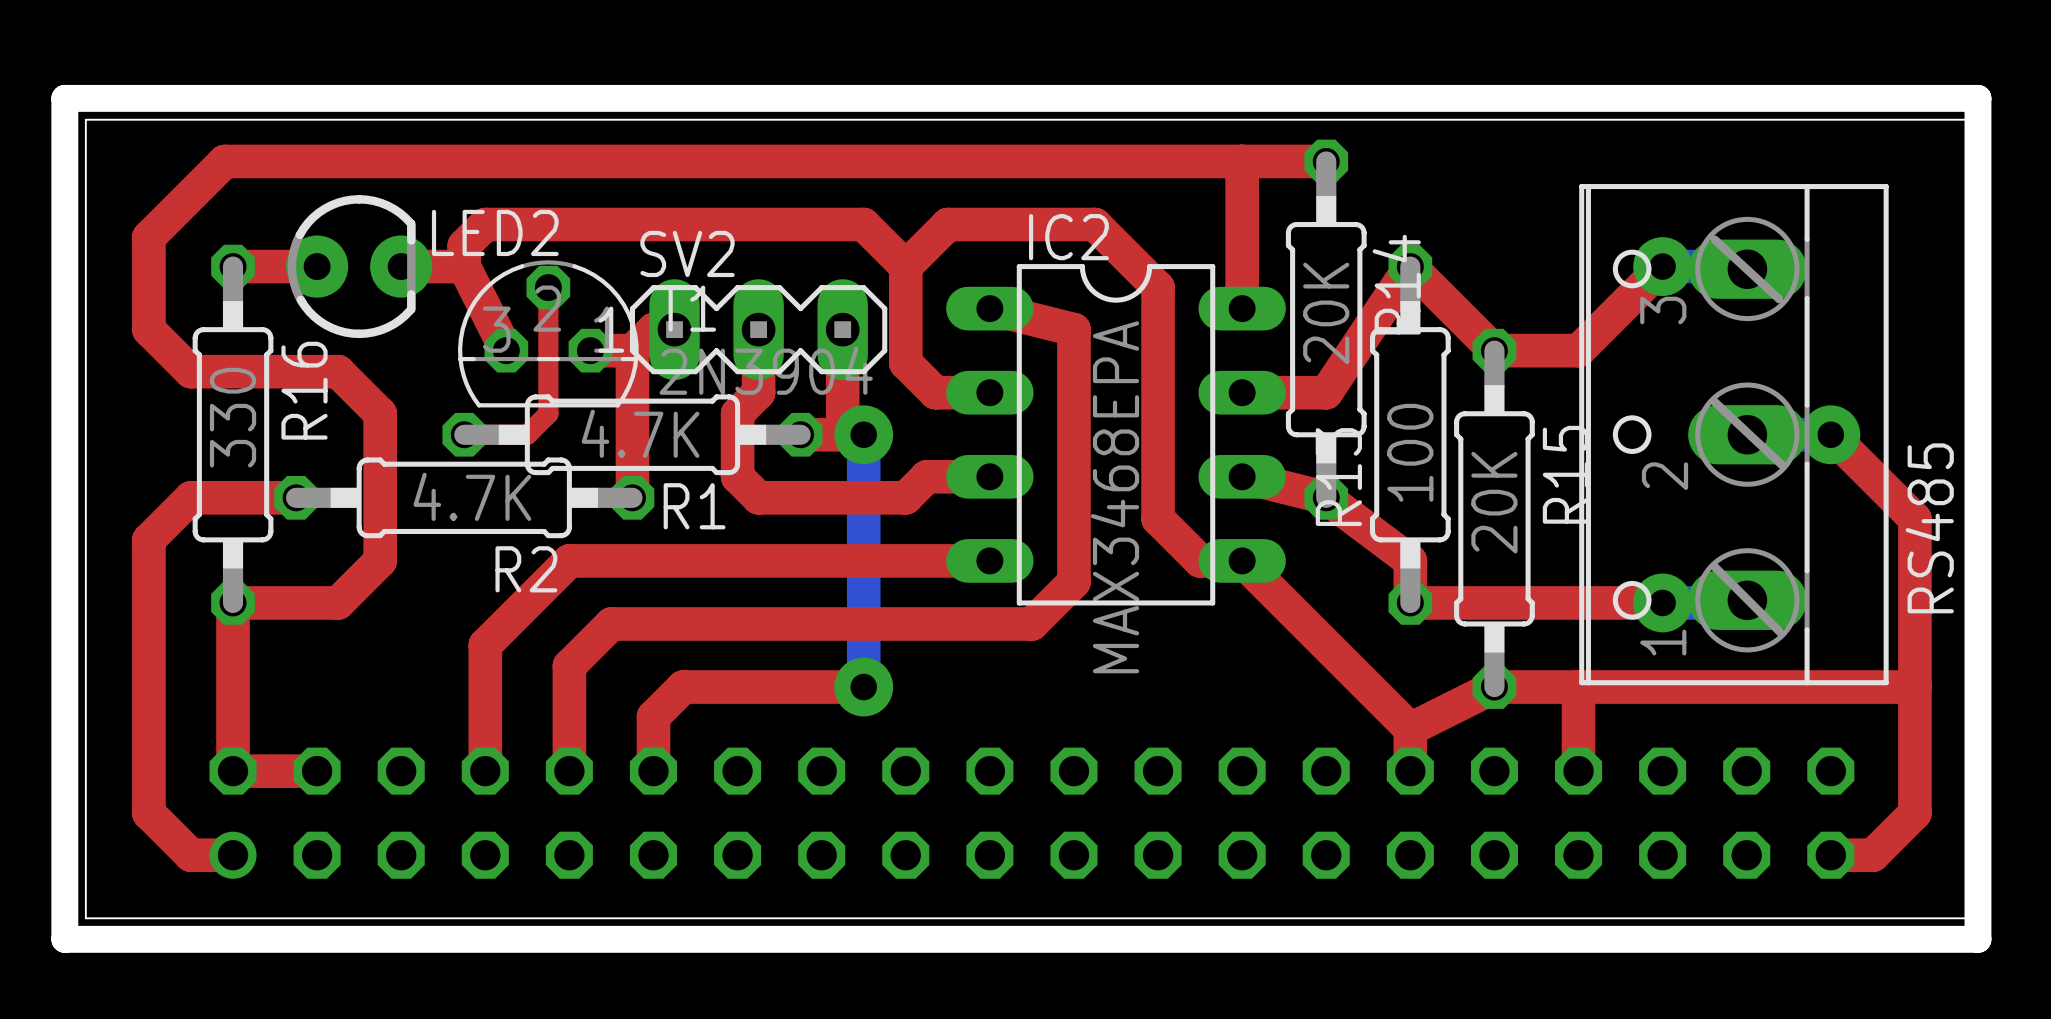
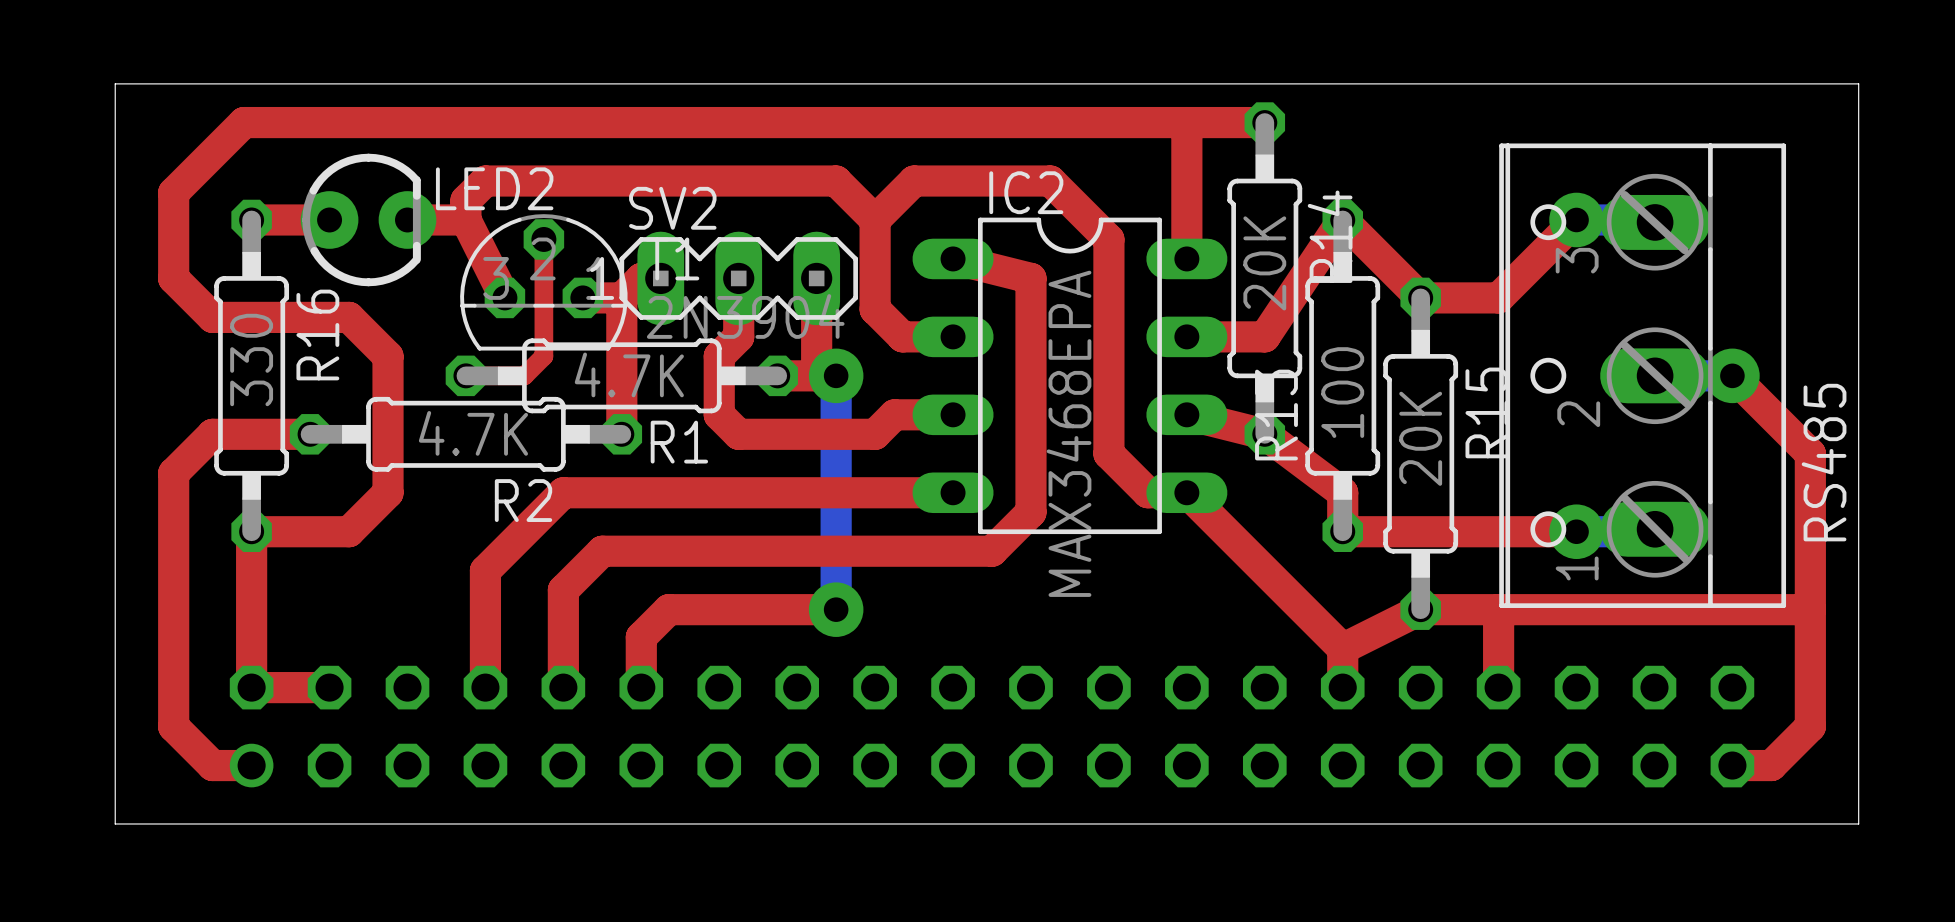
board edge: (64, 98) (64, 939) (1977, 939) (1977, 98) (64, 98) -> none

